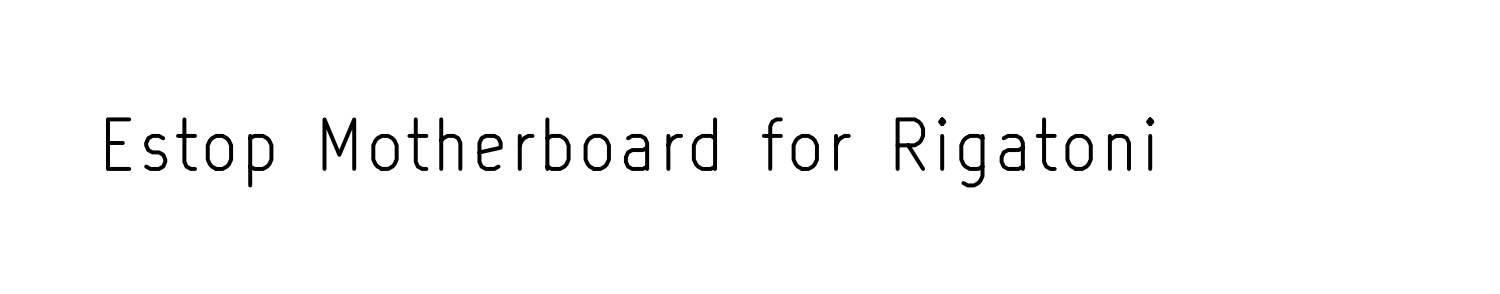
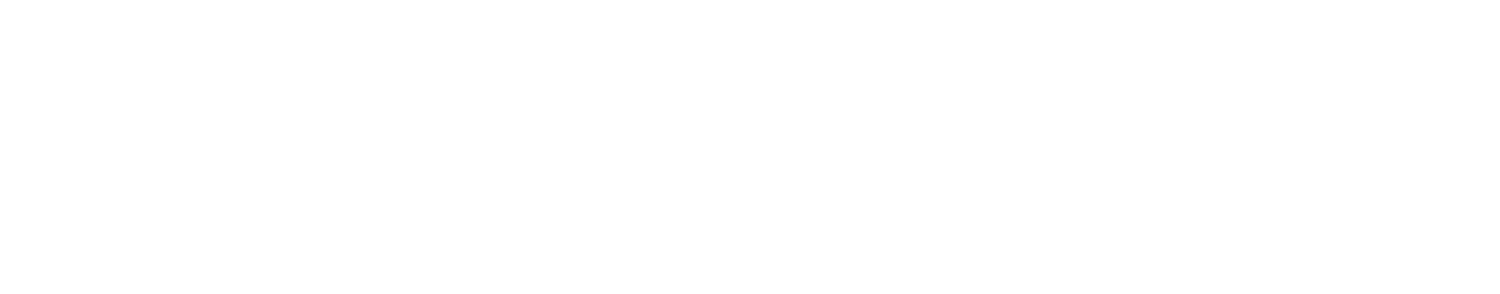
text: Estop Motherboard for Rigatoni (630, 152) -> none

